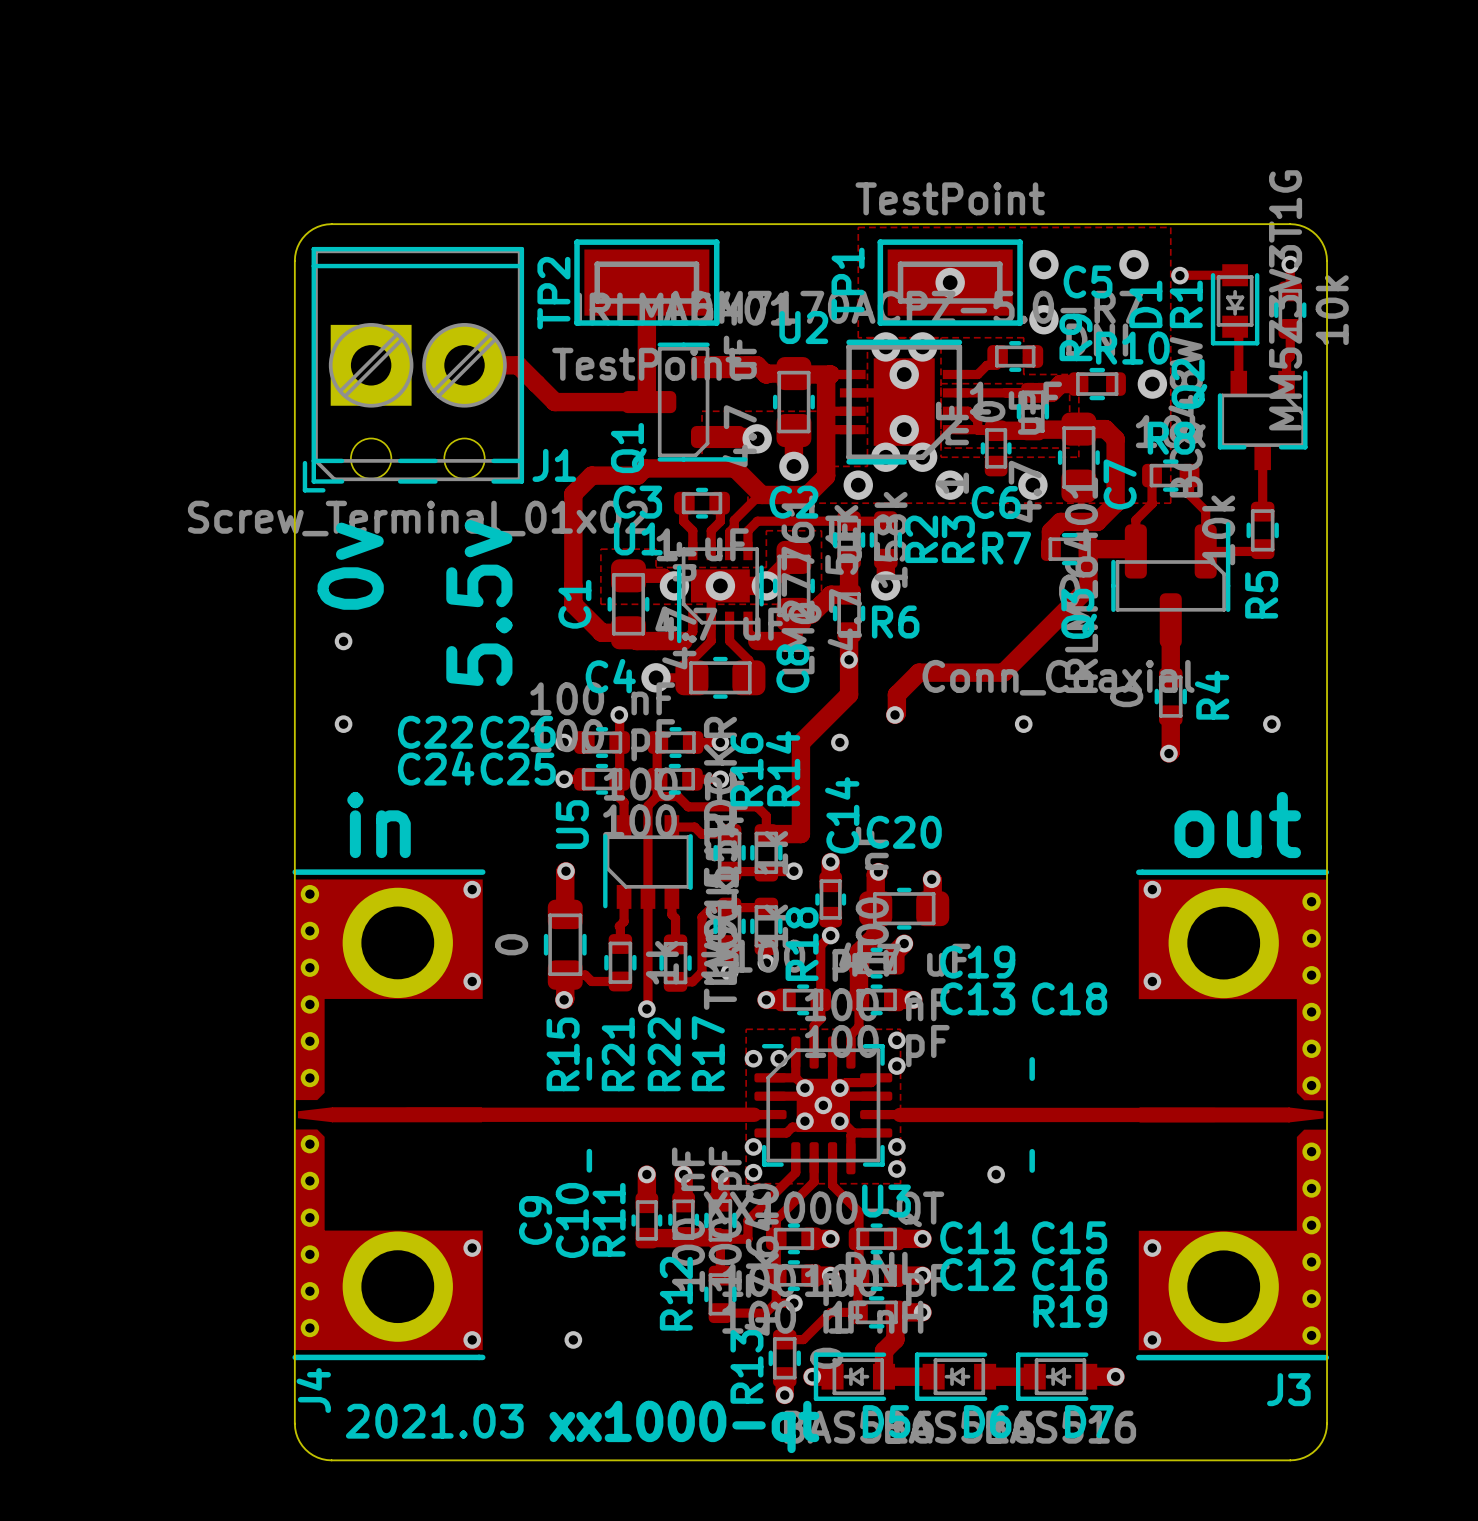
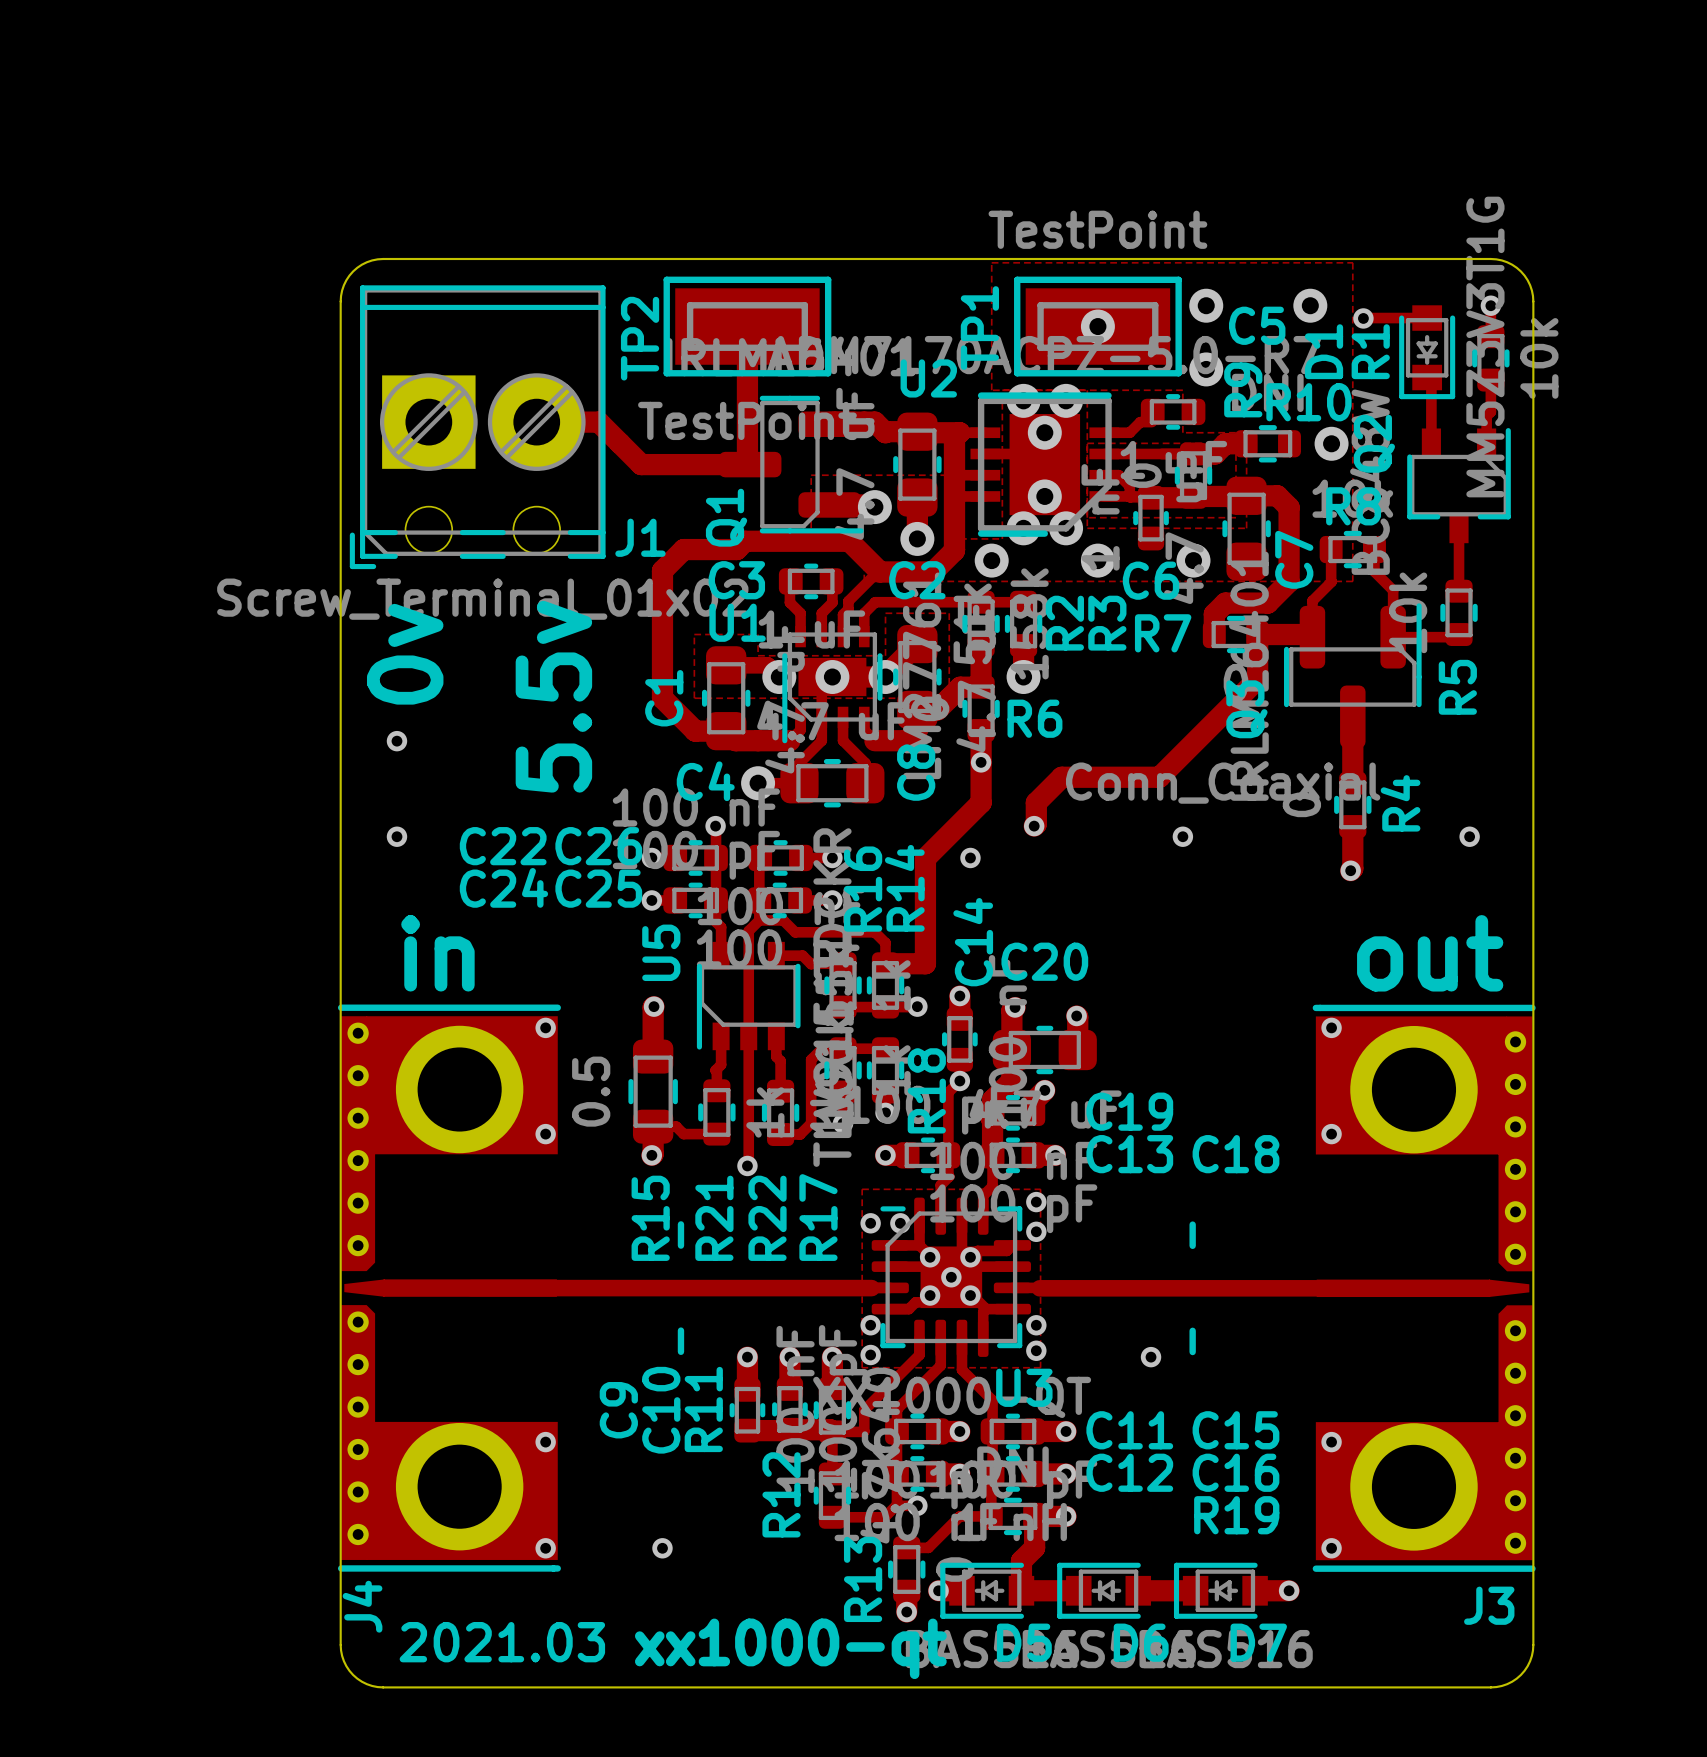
R15 value: 0 (511, 944) -> 0.5 (591, 1091)

